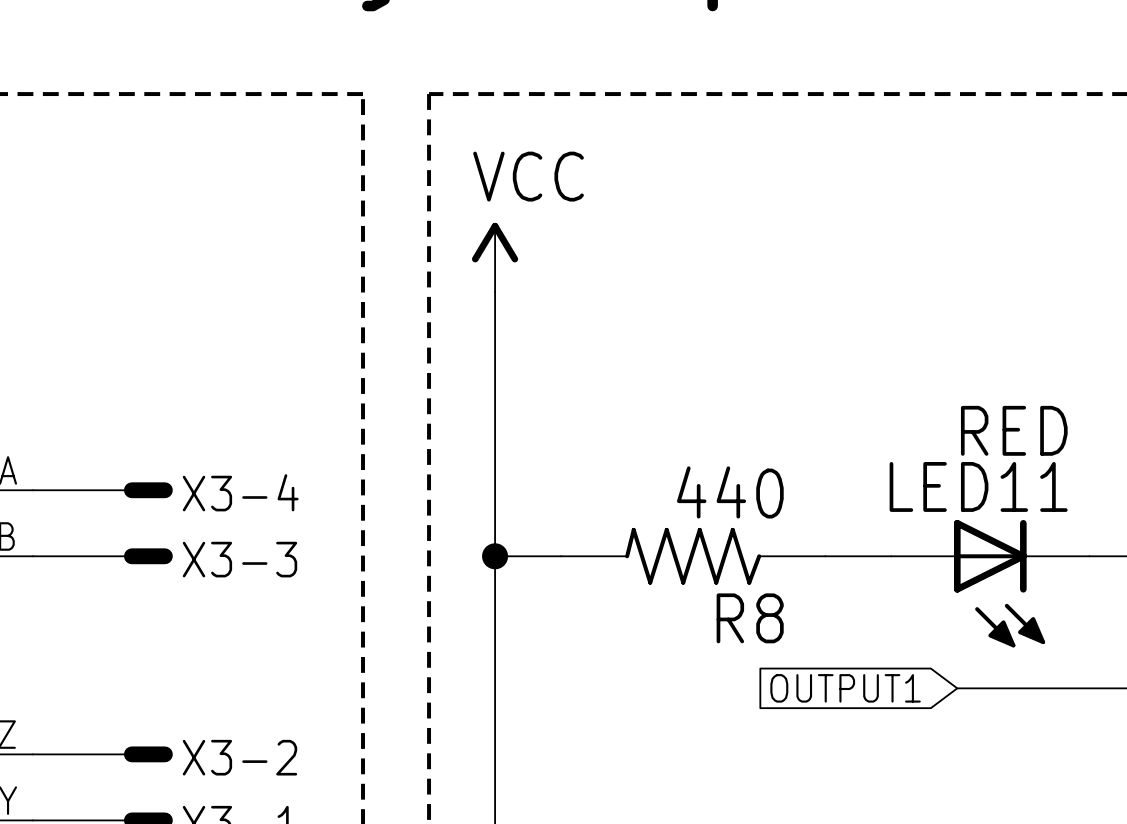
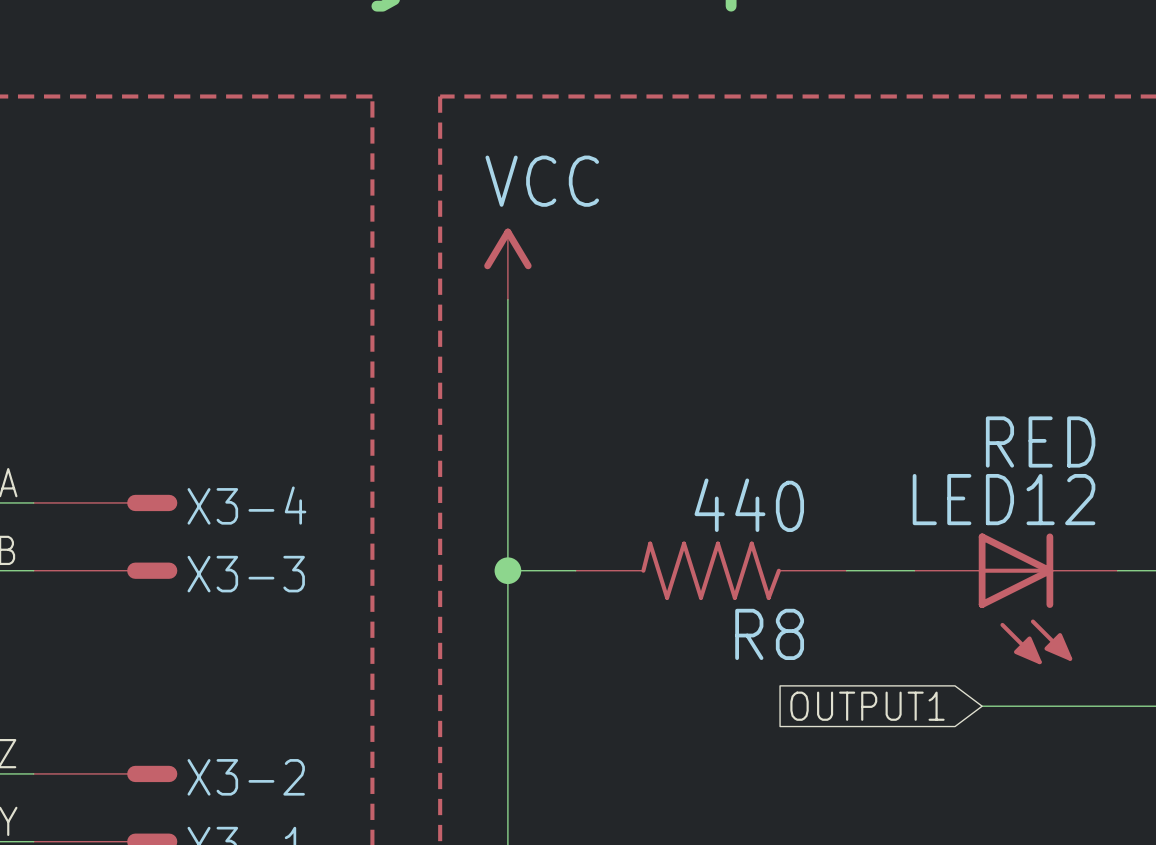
LED11 name: LED11 (978, 486) -> LED12 (1004, 499)

